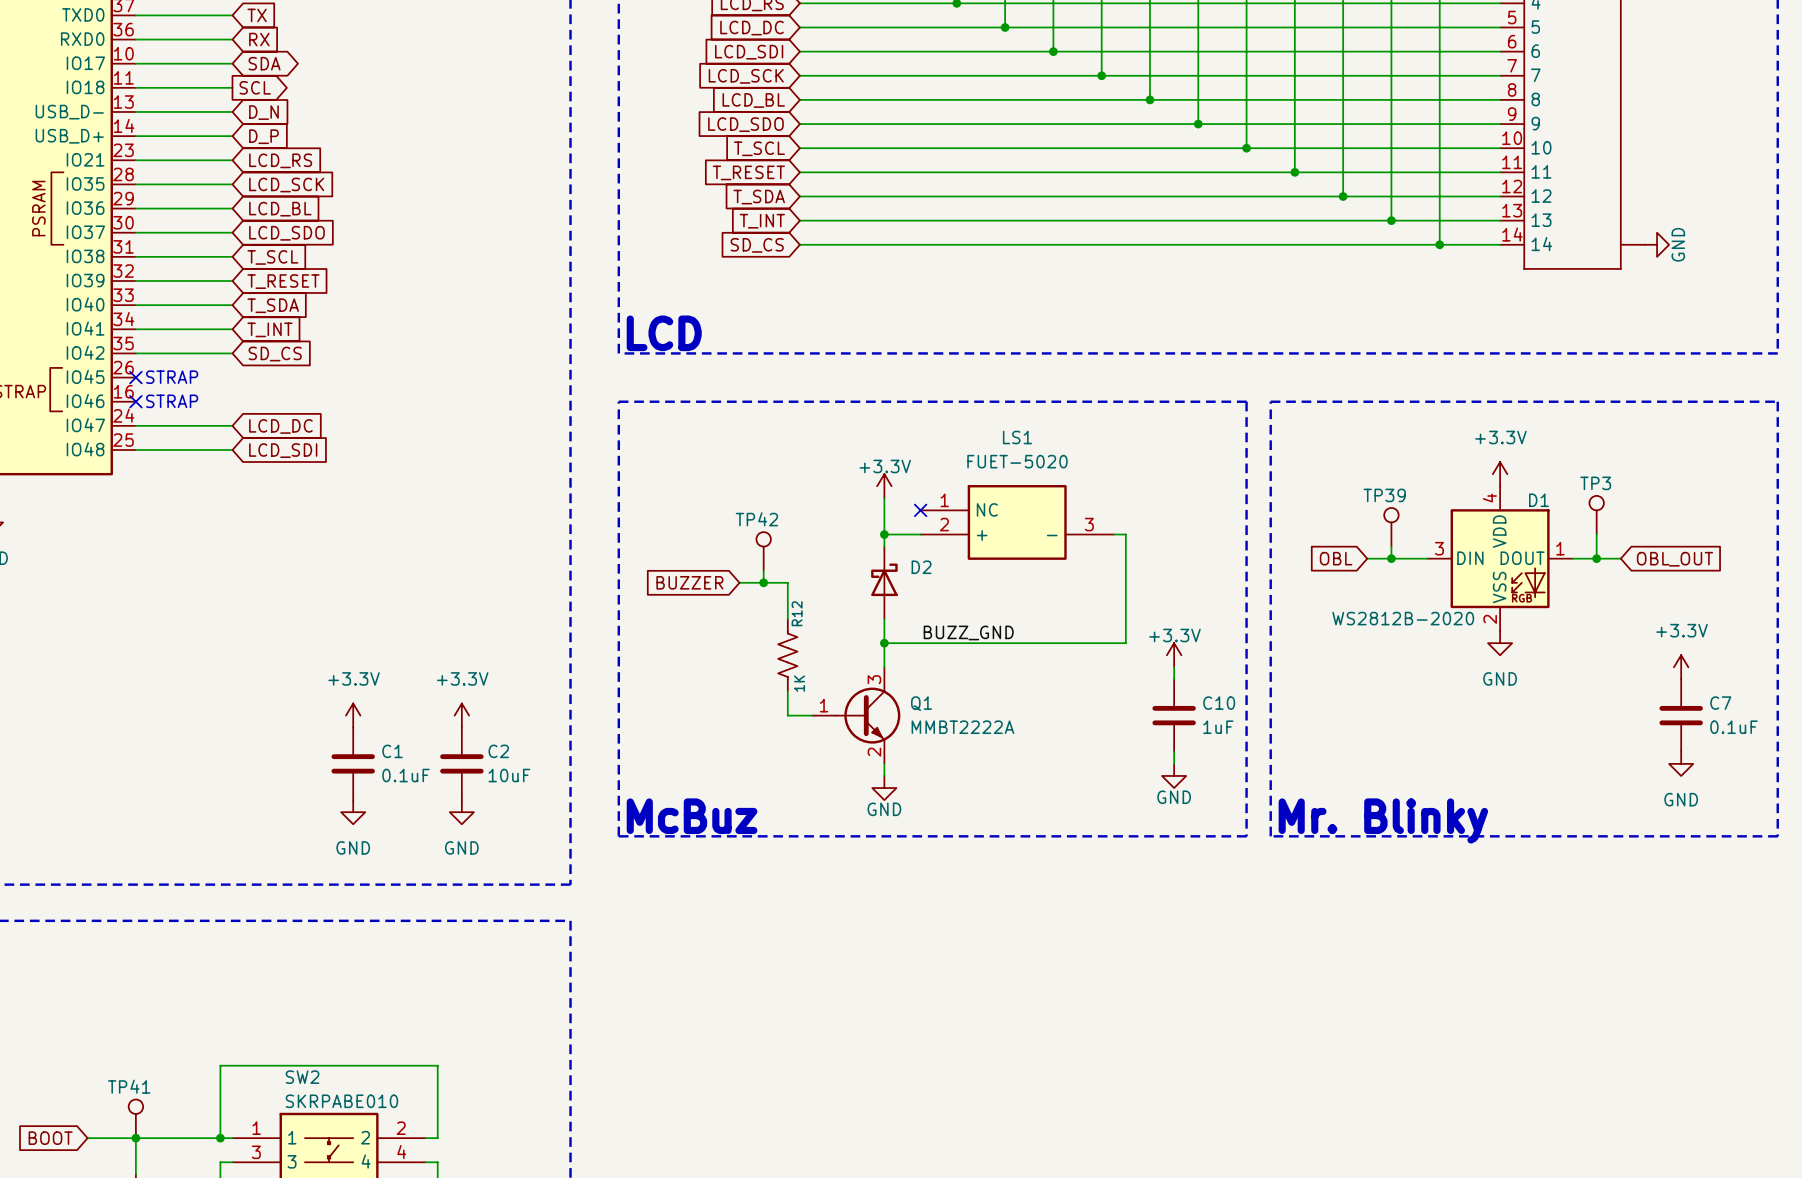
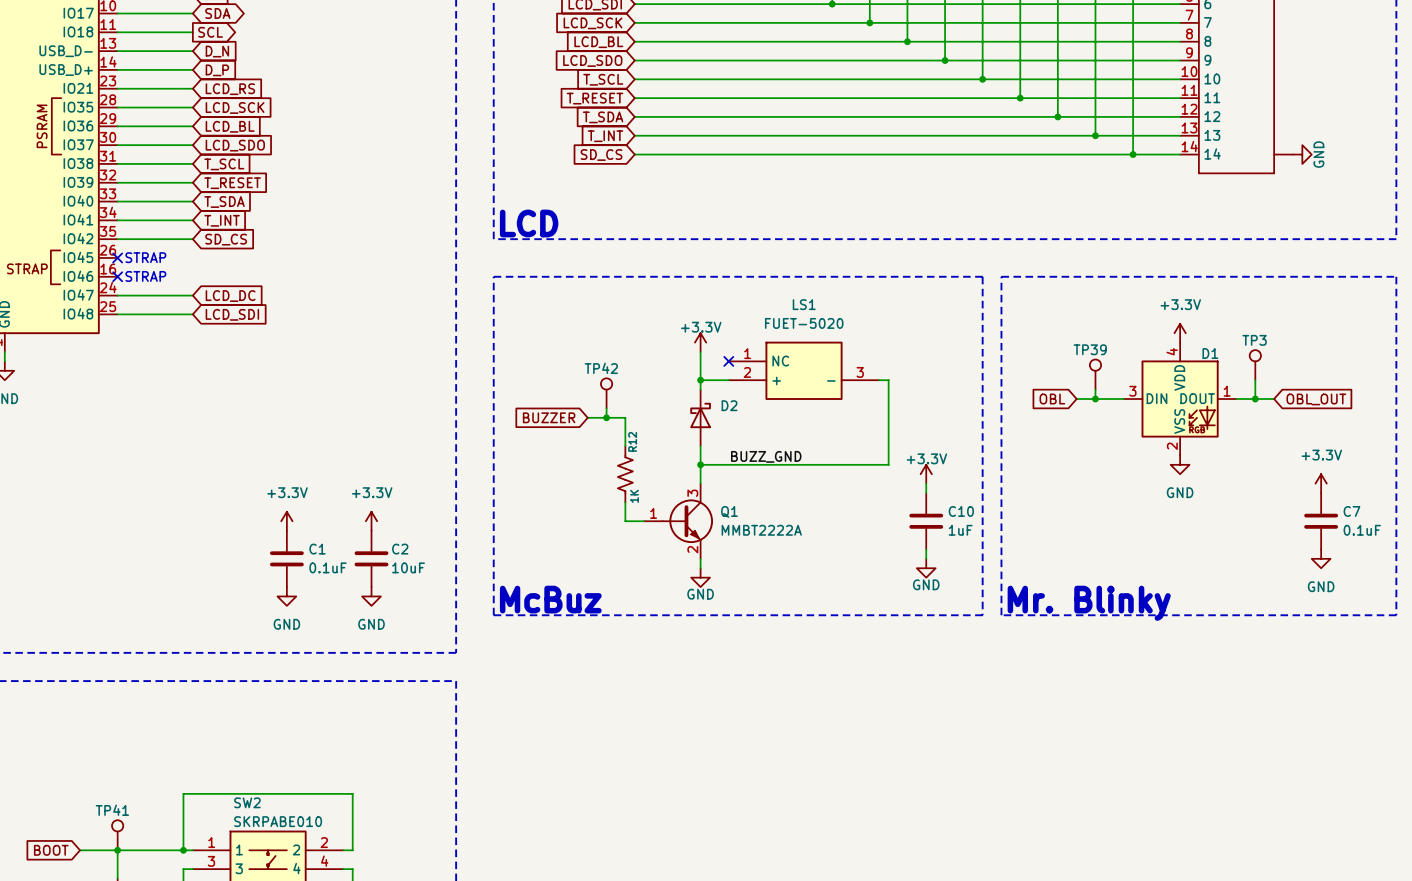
D1 value: WS2812B-2020 (1403, 618) -> none

